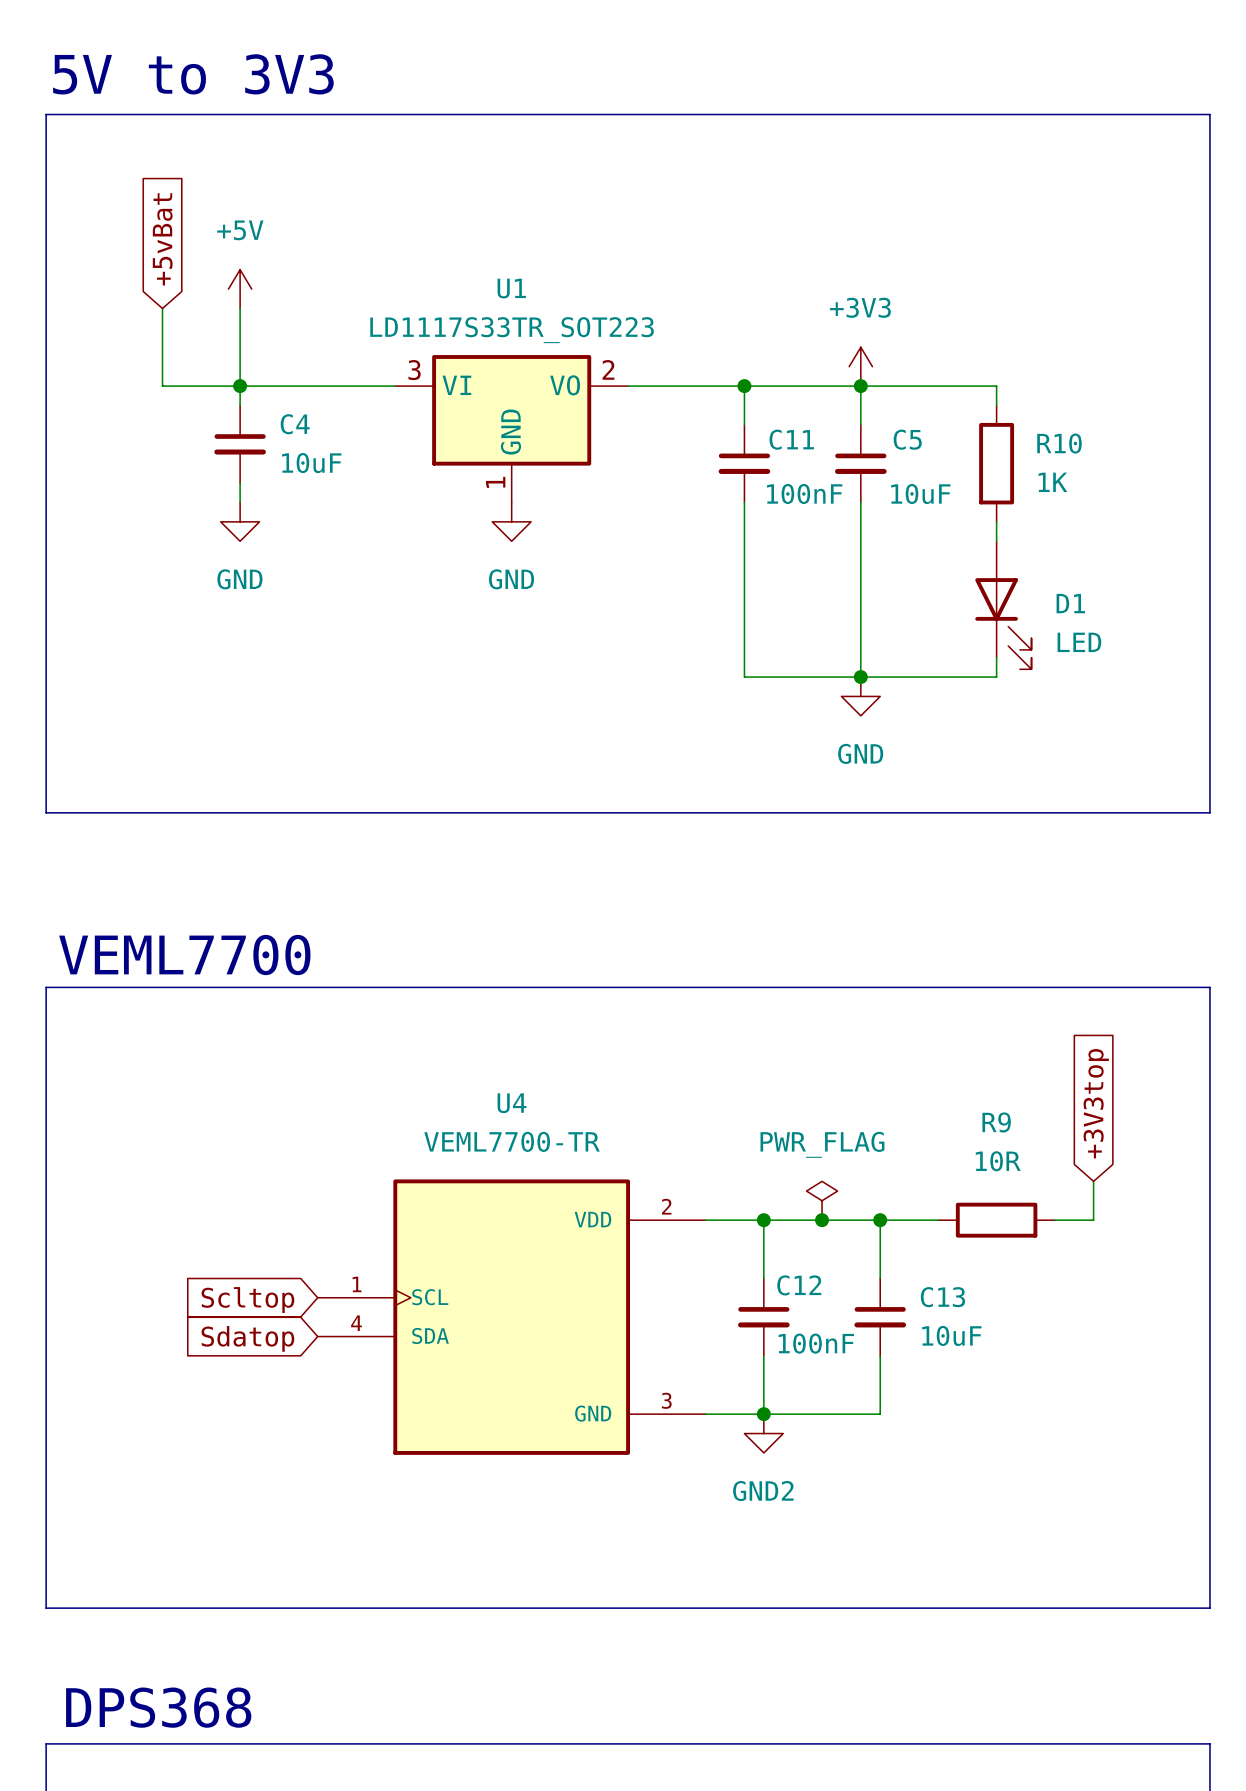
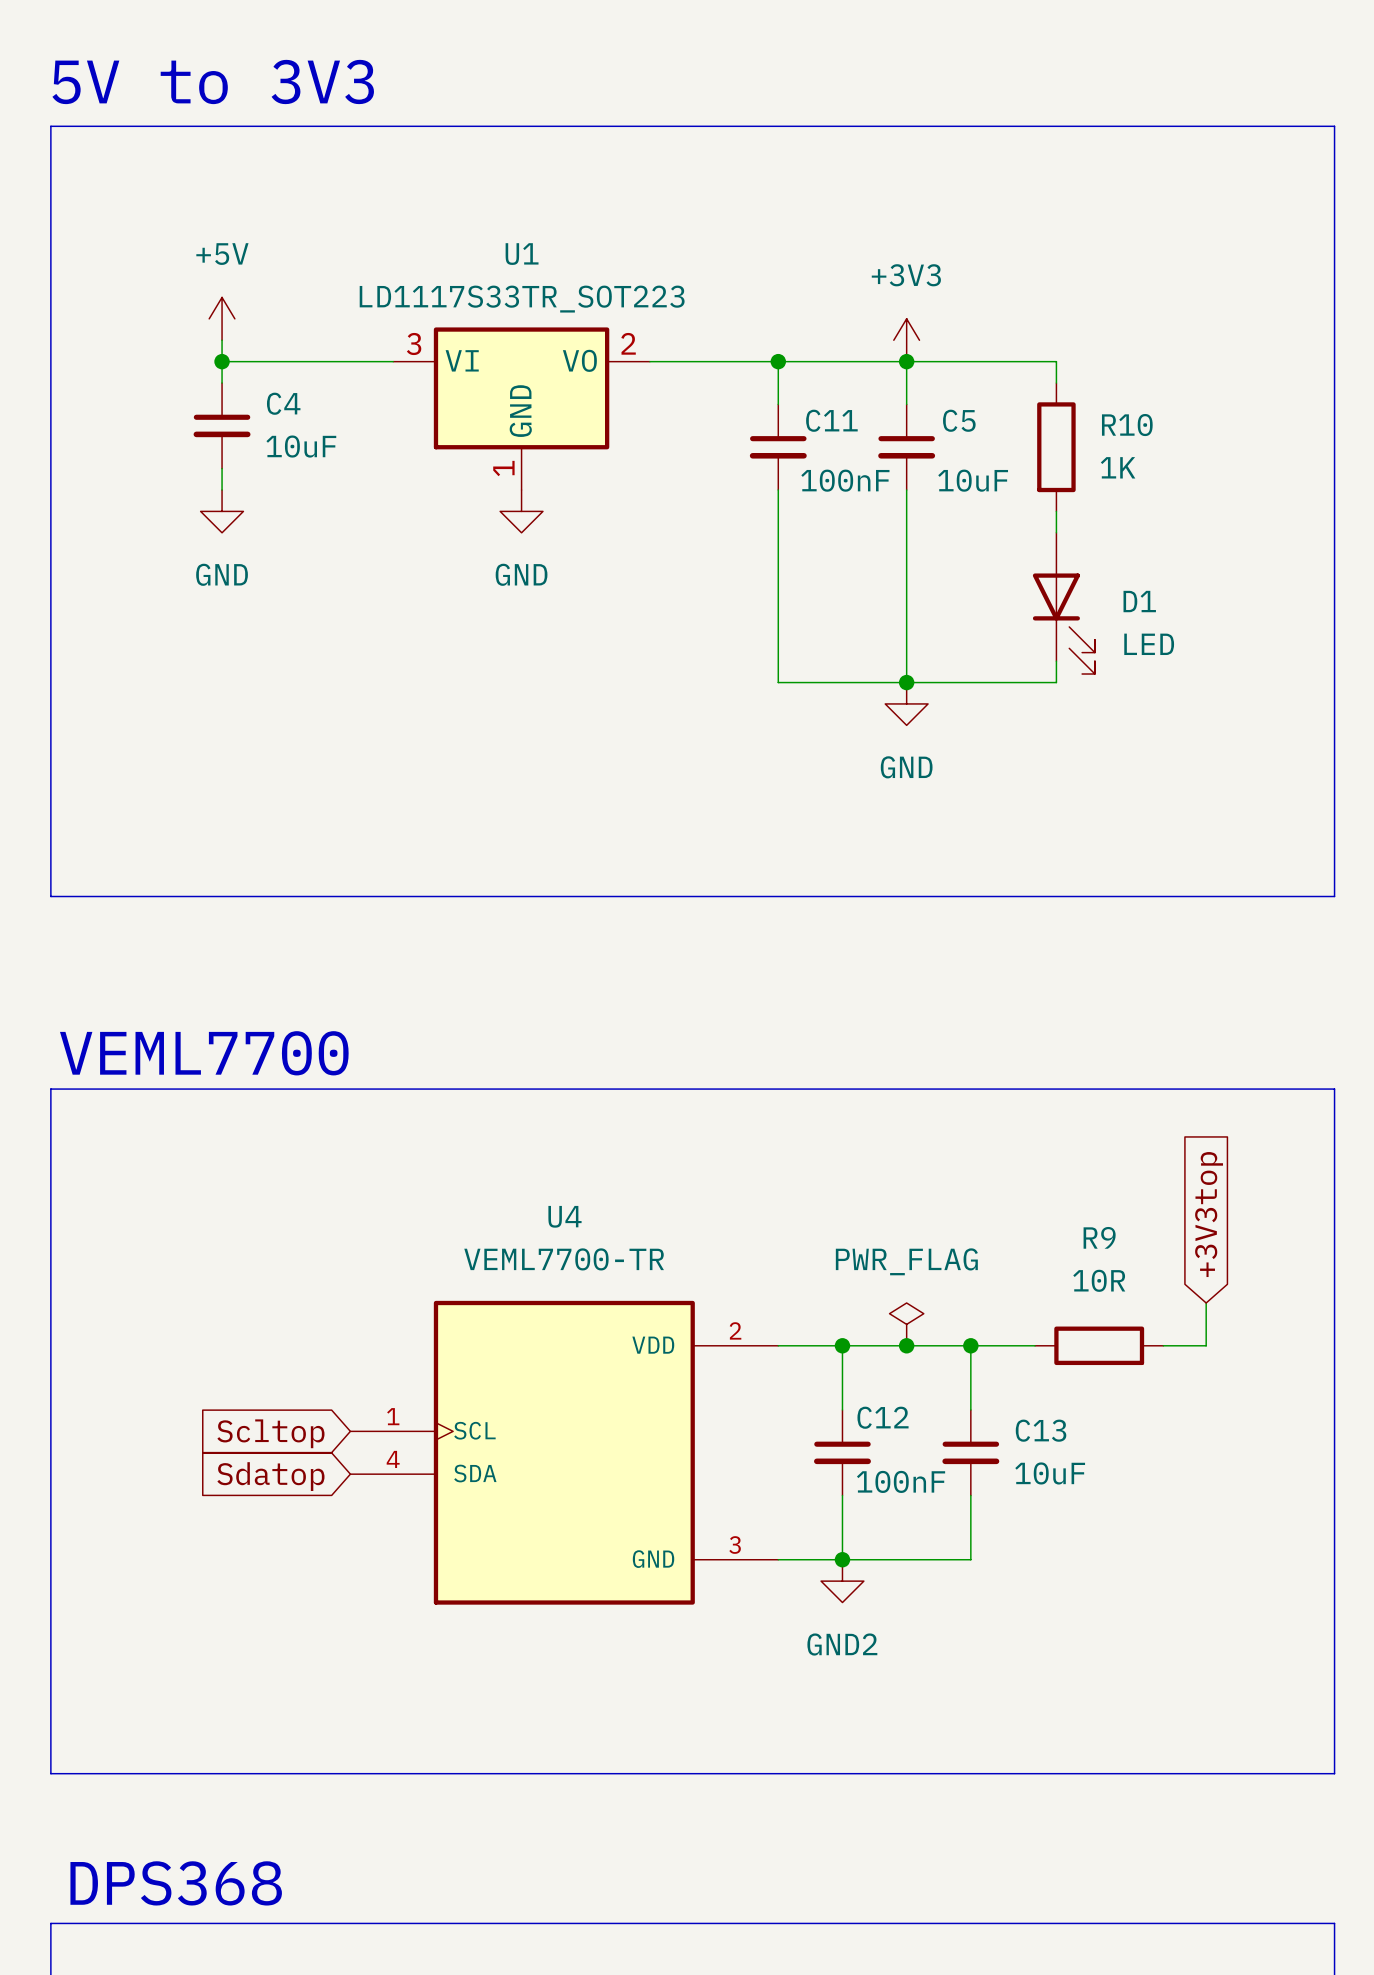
global label: +5vBat (162, 239) -> none
power symbol position: +5V (240, 289) -> +5V (222, 318)
wire: (162, 308) (162, 386) (395, 386) -> none
wire: none -> (222, 340) (222, 383)
wire: (240, 308) (240, 405) -> none
wire: none -> (222, 361) (393, 361)
junction: none -> (778, 361)
junction: none -> (906, 361)
power symbol position: +3V3 (860, 366) -> +3V3 (906, 340)
junction position: (240, 386) -> (222, 361)
wire: (628, 386) (996, 386) (996, 405) -> (649, 361) (1056, 361) (1056, 383)
wire: (744, 386) (744, 424) -> (778, 361) (778, 404)
junction: (744, 386) -> none
wire: (860, 386) (860, 424) -> (906, 361) (906, 404)
junction: (860, 386) -> none
U1 position: (511, 428) -> (521, 408)
C4 position: (240, 444) -> (222, 425)
C11 position: (744, 463) -> (778, 447)
C5 position: (860, 463) -> (906, 447)
R10 position: (996, 463) -> (1056, 447)
wire: (240, 483) (240, 502) -> (222, 468) (222, 490)
wire: (744, 502) (744, 677) (996, 677) (996, 657) -> (778, 490) (778, 682) (1056, 682) (1056, 661)
wire: (860, 502) (860, 677) -> (906, 490) (906, 682)
power symbol position: GND (240, 521) -> GND (222, 511)
power symbol position: GND (511, 521) -> GND (521, 511)
wire: (996, 521) (996, 541) -> (1056, 511) (1056, 532)
D1 position: (1003, 605) -> (1063, 603)
junction position: (860, 677) -> (906, 682)
power symbol position: GND (860, 696) -> GND (906, 703)

